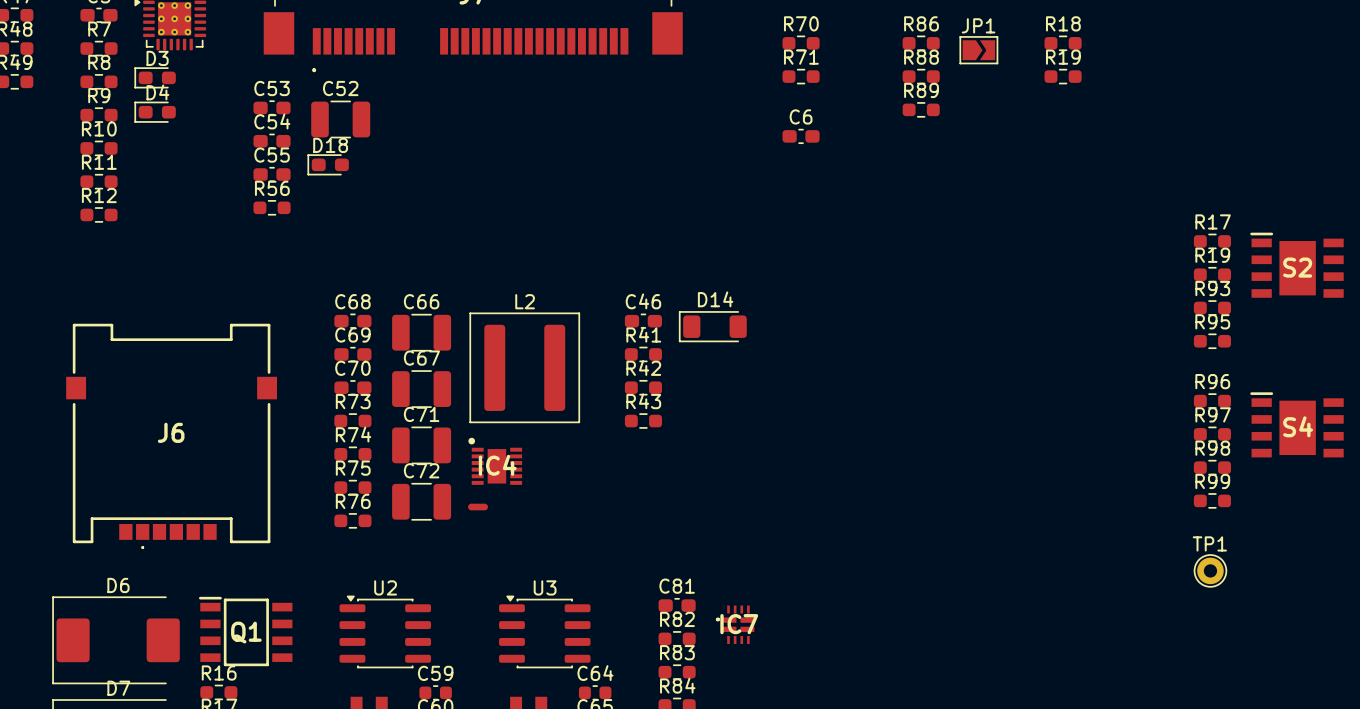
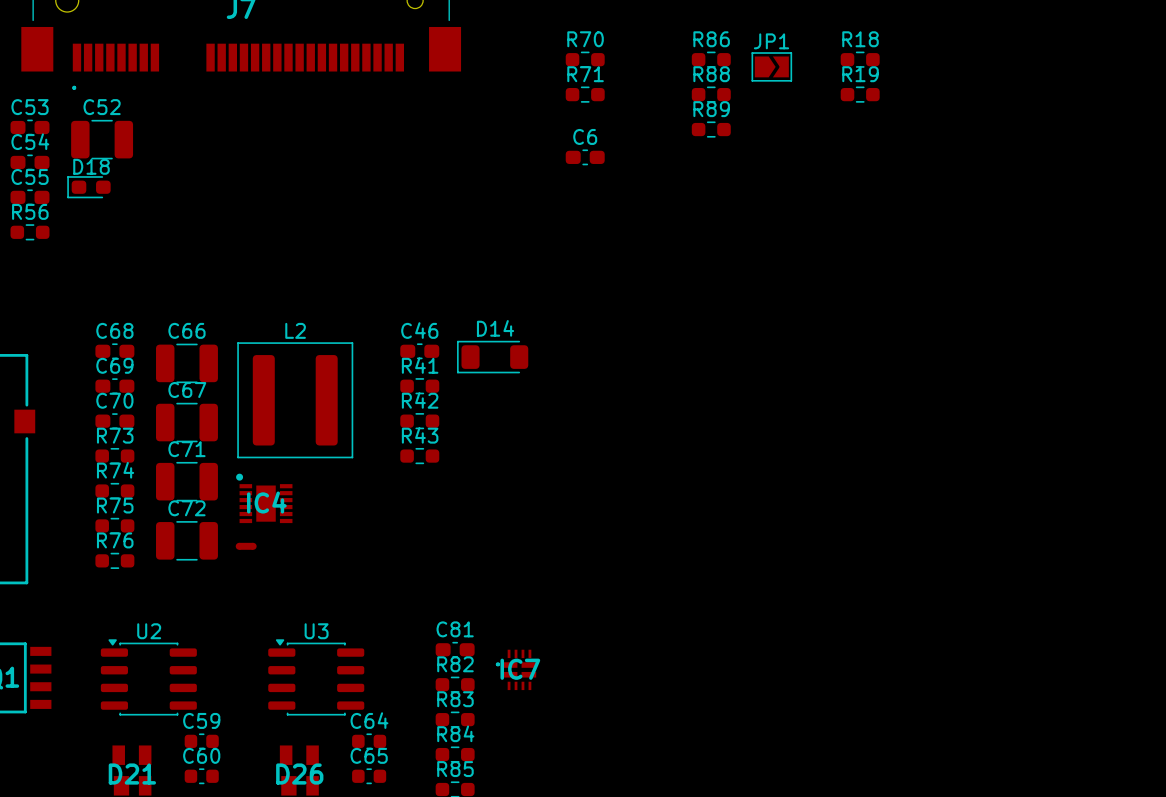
R17: (1212, 241) -> none
S2: (1296, 265) -> none
R19: (1212, 274) -> none
R93: (1212, 307) -> none
R95: (1212, 341) -> none
R96: (1212, 401) -> none
S4: (1296, 424) -> none
R97: (1212, 434) -> none
R98: (1212, 467) -> none
R99: (1212, 500) -> none
TP1: (1210, 570) -> none

